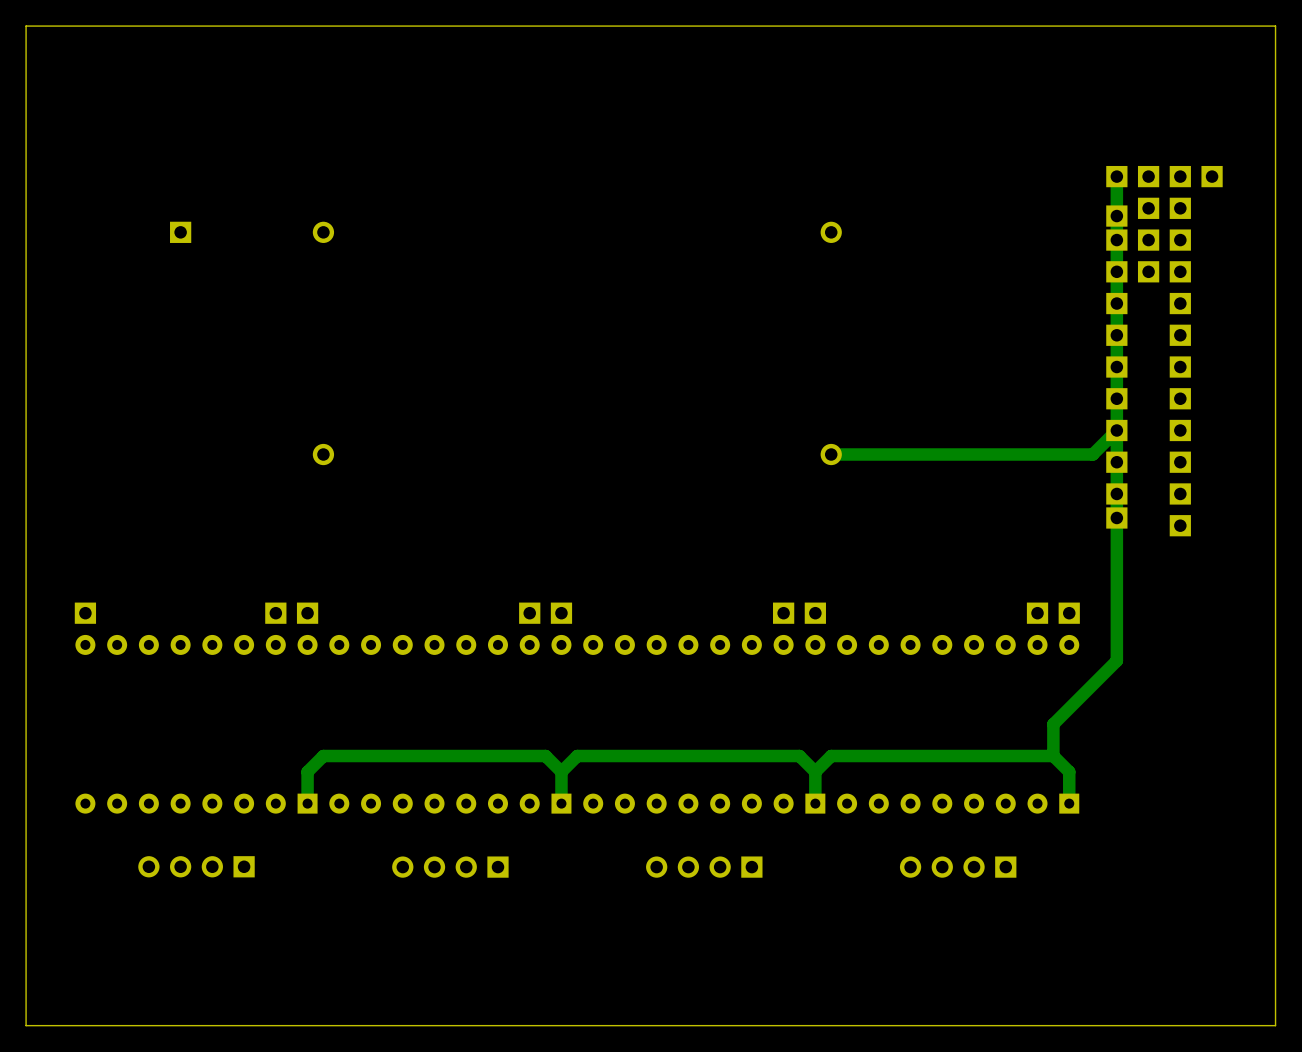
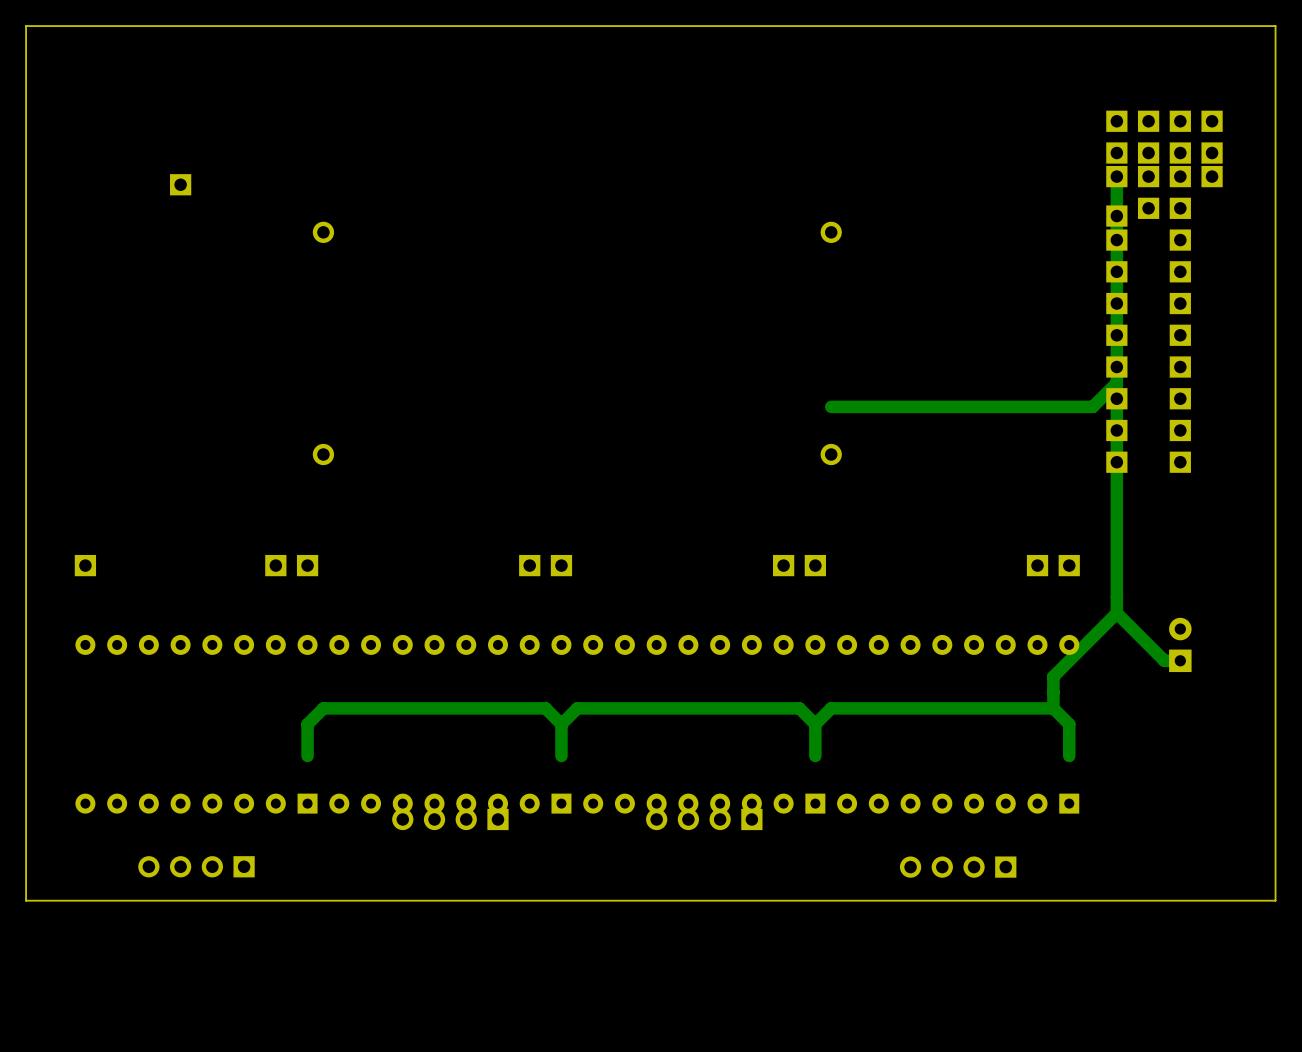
part: none -> (1116, 121)
part: none -> (1148, 121)
part: none -> (1180, 121)
part: none -> (1212, 121)
part: none -> (1116, 153)
part: none -> (1148, 153)
part: none -> (1180, 153)
part: none -> (1212, 153)
part position: (180, 232) -> (180, 184)
part: (1148, 240) -> none
part: (1148, 271) -> none
track: (1116, 430) (1092, 454) (831, 454) -> (1116, 382) (1092, 406) (831, 406)
part: (1116, 493) -> none
part: (1180, 493) -> none
part: (1116, 517) -> none
part: (1180, 525) -> none
part: none -> (275, 565)
part: none -> (307, 565)
part: none -> (529, 565)
part: none -> (561, 565)
part: none -> (783, 565)
part: none -> (815, 565)
part: none -> (1037, 565)
part: none -> (1069, 565)
part position: (85, 613) -> (85, 565)
part: (275, 613) -> none
part: (307, 613) -> none
part: (529, 613) -> none
part: (561, 613) -> none
part: (783, 613) -> none
part: (815, 613) -> none
part: (1037, 613) -> none
part: (1069, 613) -> none
track: (1116, 613) (1116, 660) (1053, 724) (1053, 756) -> none
part: none -> (1180, 644)
track: none -> (1180, 660) (1164, 660) (1116, 613) (1053, 676) (1053, 708)
track: (1053, 756) (831, 756) (815, 771) -> (1053, 708) (831, 708) (815, 724)
track: (1053, 756) (1069, 771) (1069, 803) -> (1053, 708) (1069, 724) (1069, 756)
track: (561, 771) (561, 803) -> (561, 724) (561, 756)
track: (561, 771) (545, 756) (323, 756) (307, 771) (307, 803) -> (561, 724) (545, 708) (323, 708) (307, 724) (307, 756)
track: (815, 771) (799, 756) (577, 756) (561, 771) -> (815, 724) (799, 708) (577, 708) (561, 724)
track: (815, 771) (815, 803) -> (815, 724) (815, 756)
part position: (450, 867) -> (450, 819)
part position: (704, 867) -> (704, 819)
board edge: (1275, 900) (1275, 1025) (26, 1025) (26, 900) -> (1275, 900) (26, 900)

